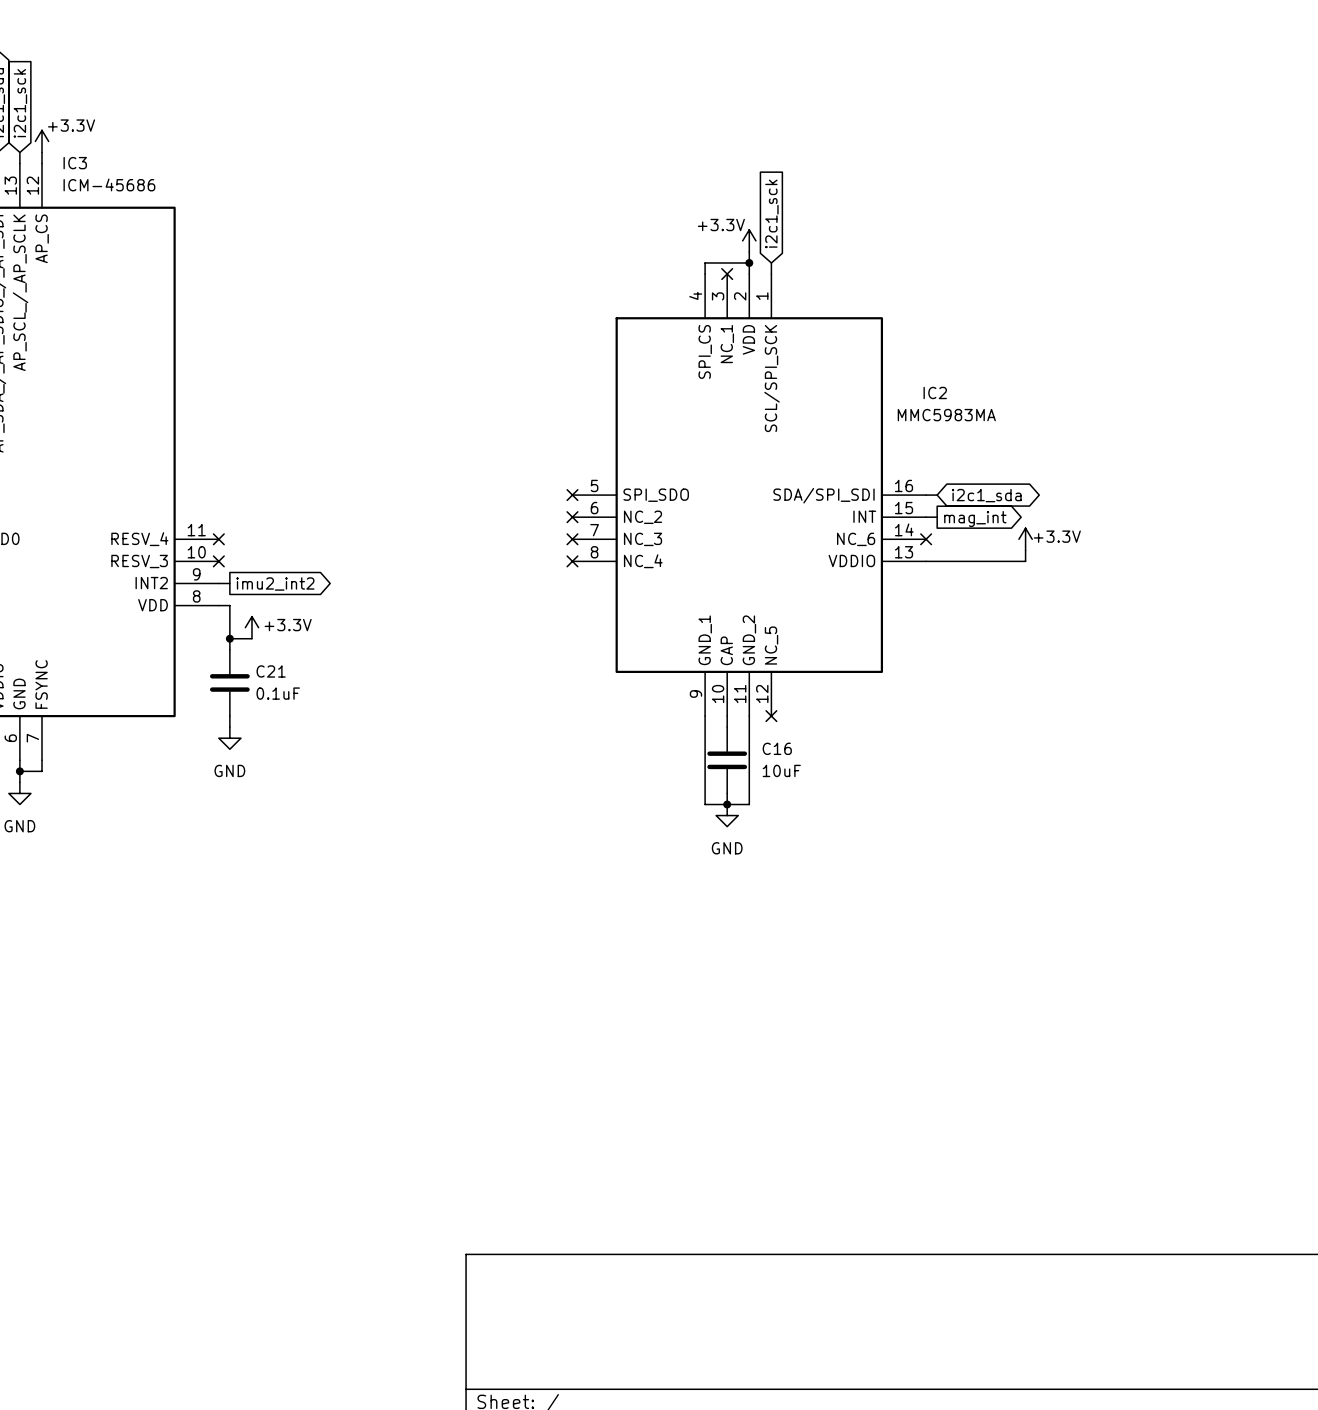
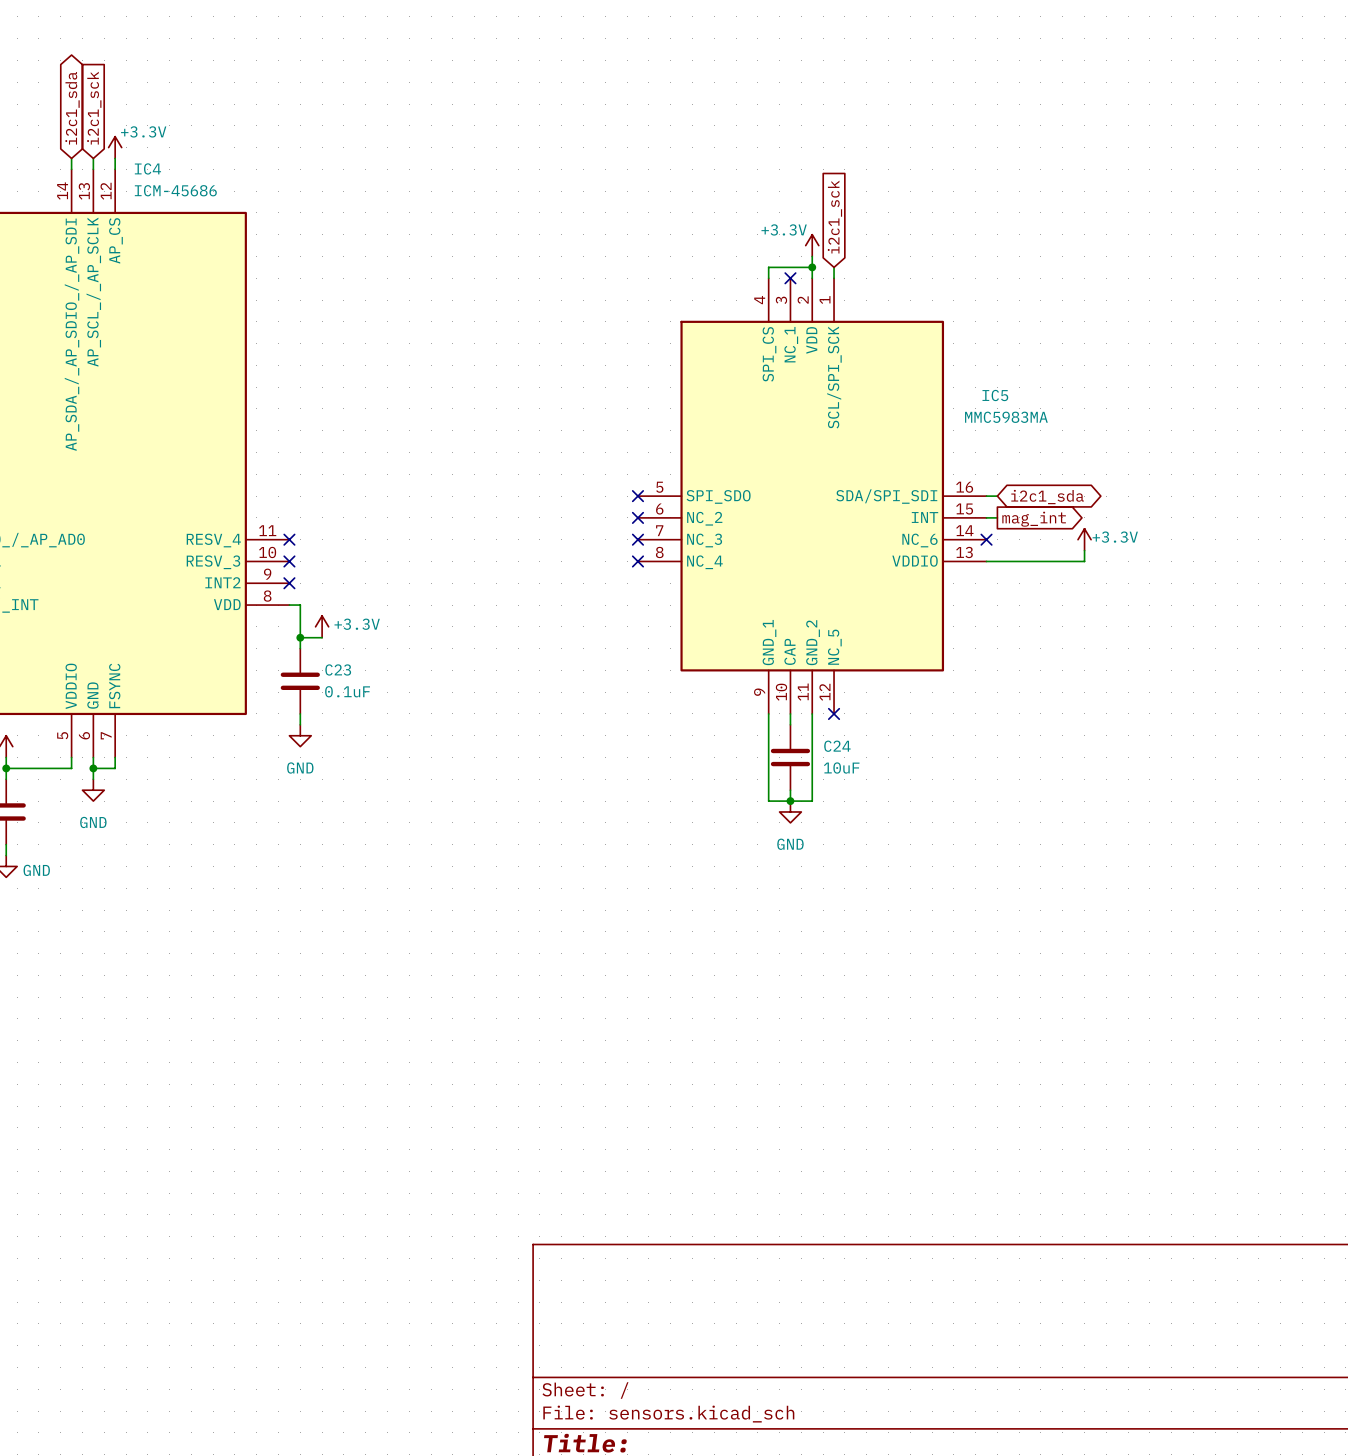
IC3 name: IC3 (75, 163) -> IC4 (147, 168)
IC2 name: IC2 (935, 392) -> IC5 (995, 395)
wire: (218, 583) (229, 583) -> none
no-connect mark: none -> (289, 583)
global label: imu2_int2 (275, 584) -> none
C21 name: C21 (271, 671) -> C23 (338, 669)
C16 name: C16 (777, 748) -> C24 (837, 746)

